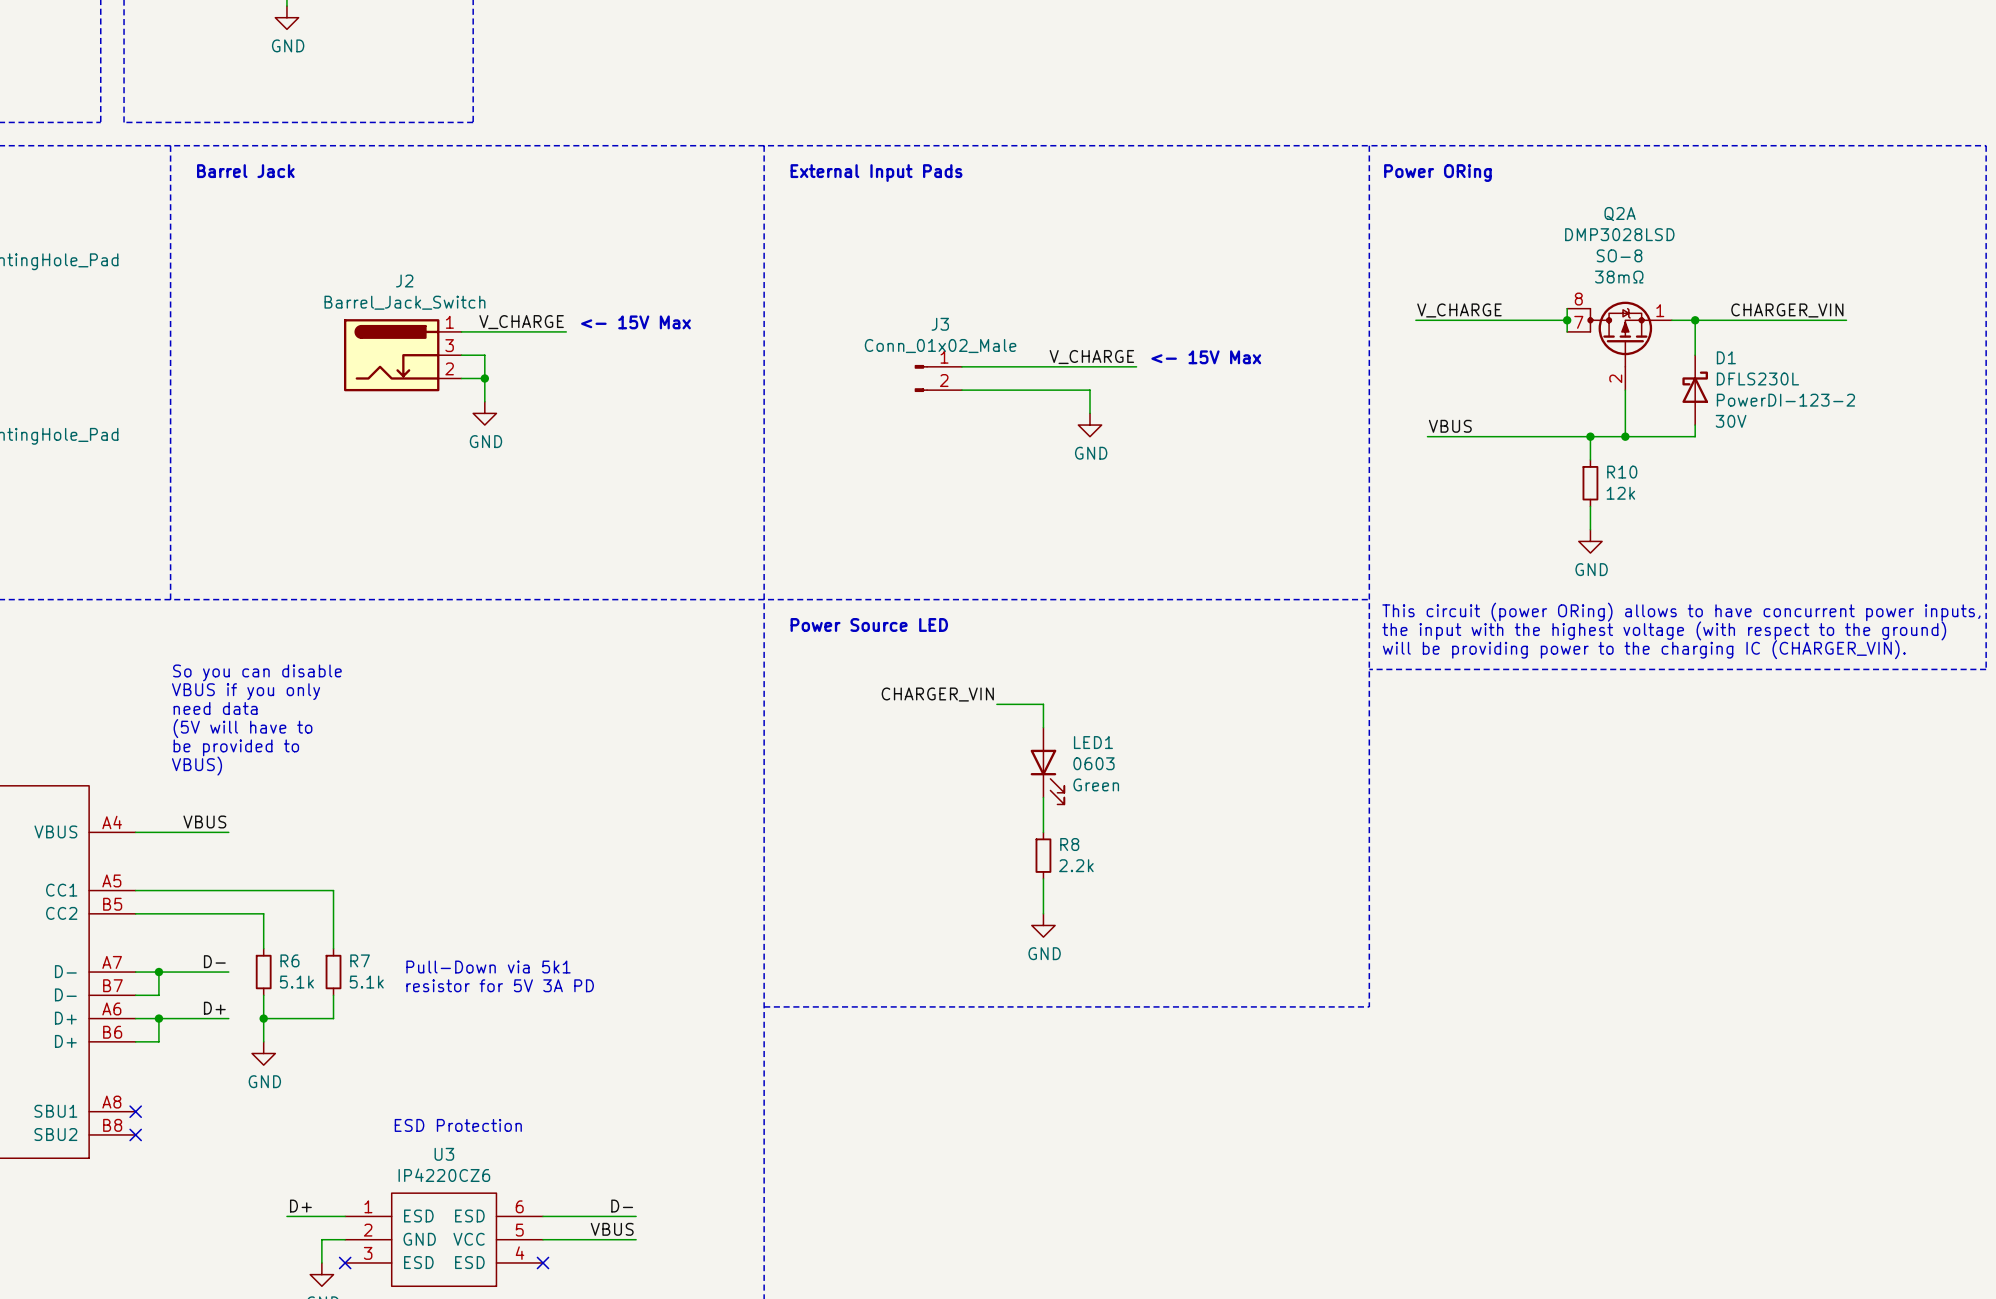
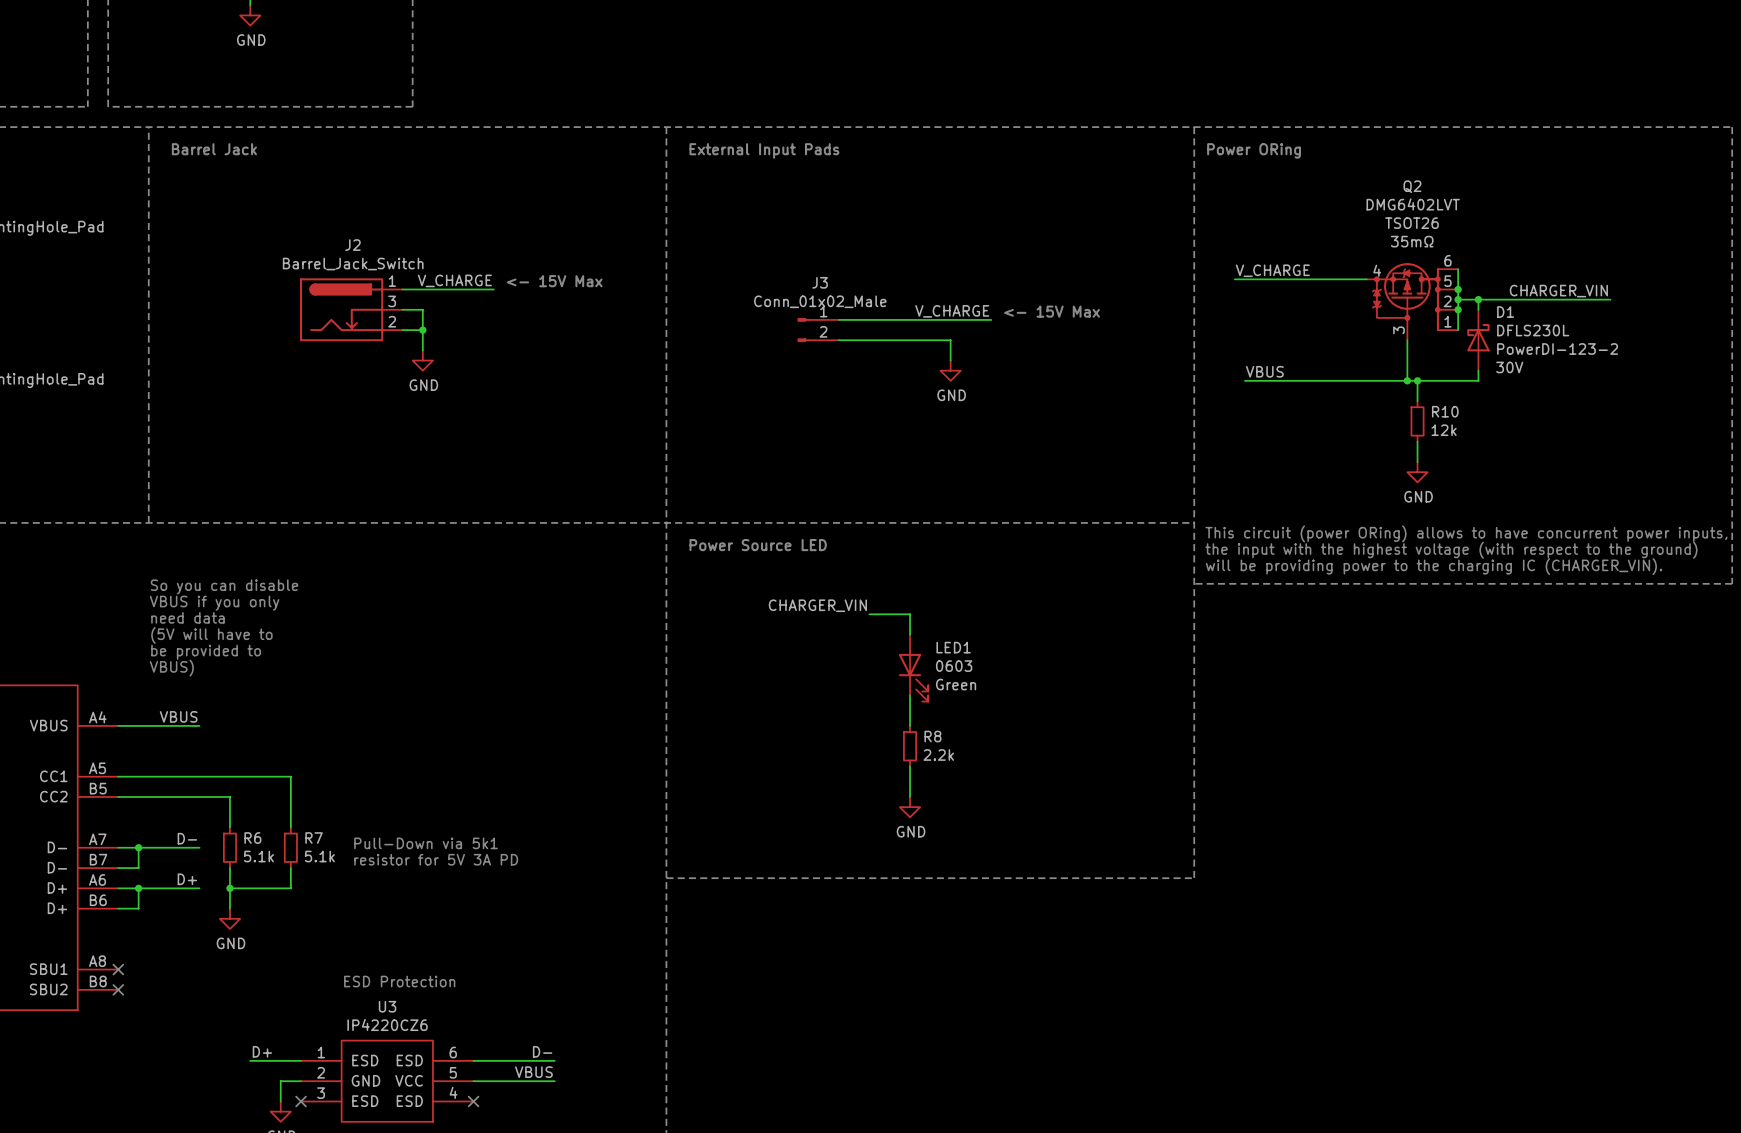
wire: (1567, 308) (1567, 331) -> none
wire: none -> (1458, 269) (1458, 330)
label position: CHARGER_VIN (1787, 310) -> CHARGER_VIN (1558, 291)
junction: (1567, 320) -> none
wire: (1671, 320) (1846, 320) -> (1458, 299) (1610, 299)
wire: (1695, 320) (1695, 343) -> none
junction: (1695, 320) -> none
junction: none -> (1458, 289)
junction: none -> (1458, 299)
junction: none -> (1478, 299)
Q2A: DMP3028LSD (1619, 345) -> none
Q2: none -> DMG6402LVT (1412, 301)
junction: none -> (1458, 309)
wire: none -> (1407, 340) (1407, 380)
wire: (1625, 390) (1625, 436) -> (1417, 401) (1417, 380)
wire: (1590, 436) (1590, 459) -> none
junction position: (1590, 436) -> (1407, 380)
R10 position: (1590, 483) -> (1417, 421)
wire: (1590, 506) (1590, 529) -> (1417, 441) (1417, 462)
power symbol position: GND (1590, 541) -> GND (1417, 472)

